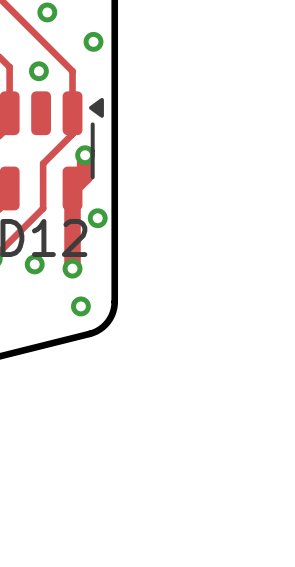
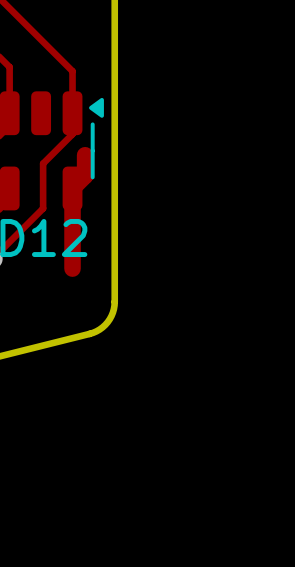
via: (47, 12) -> none
via: (93, 41) -> none
via: (38, 71) -> none
via: (85, 155) -> none
via: (97, 218) -> none
via: (34, 264) -> none
via: (72, 268) -> none
via: (80, 306) -> none

